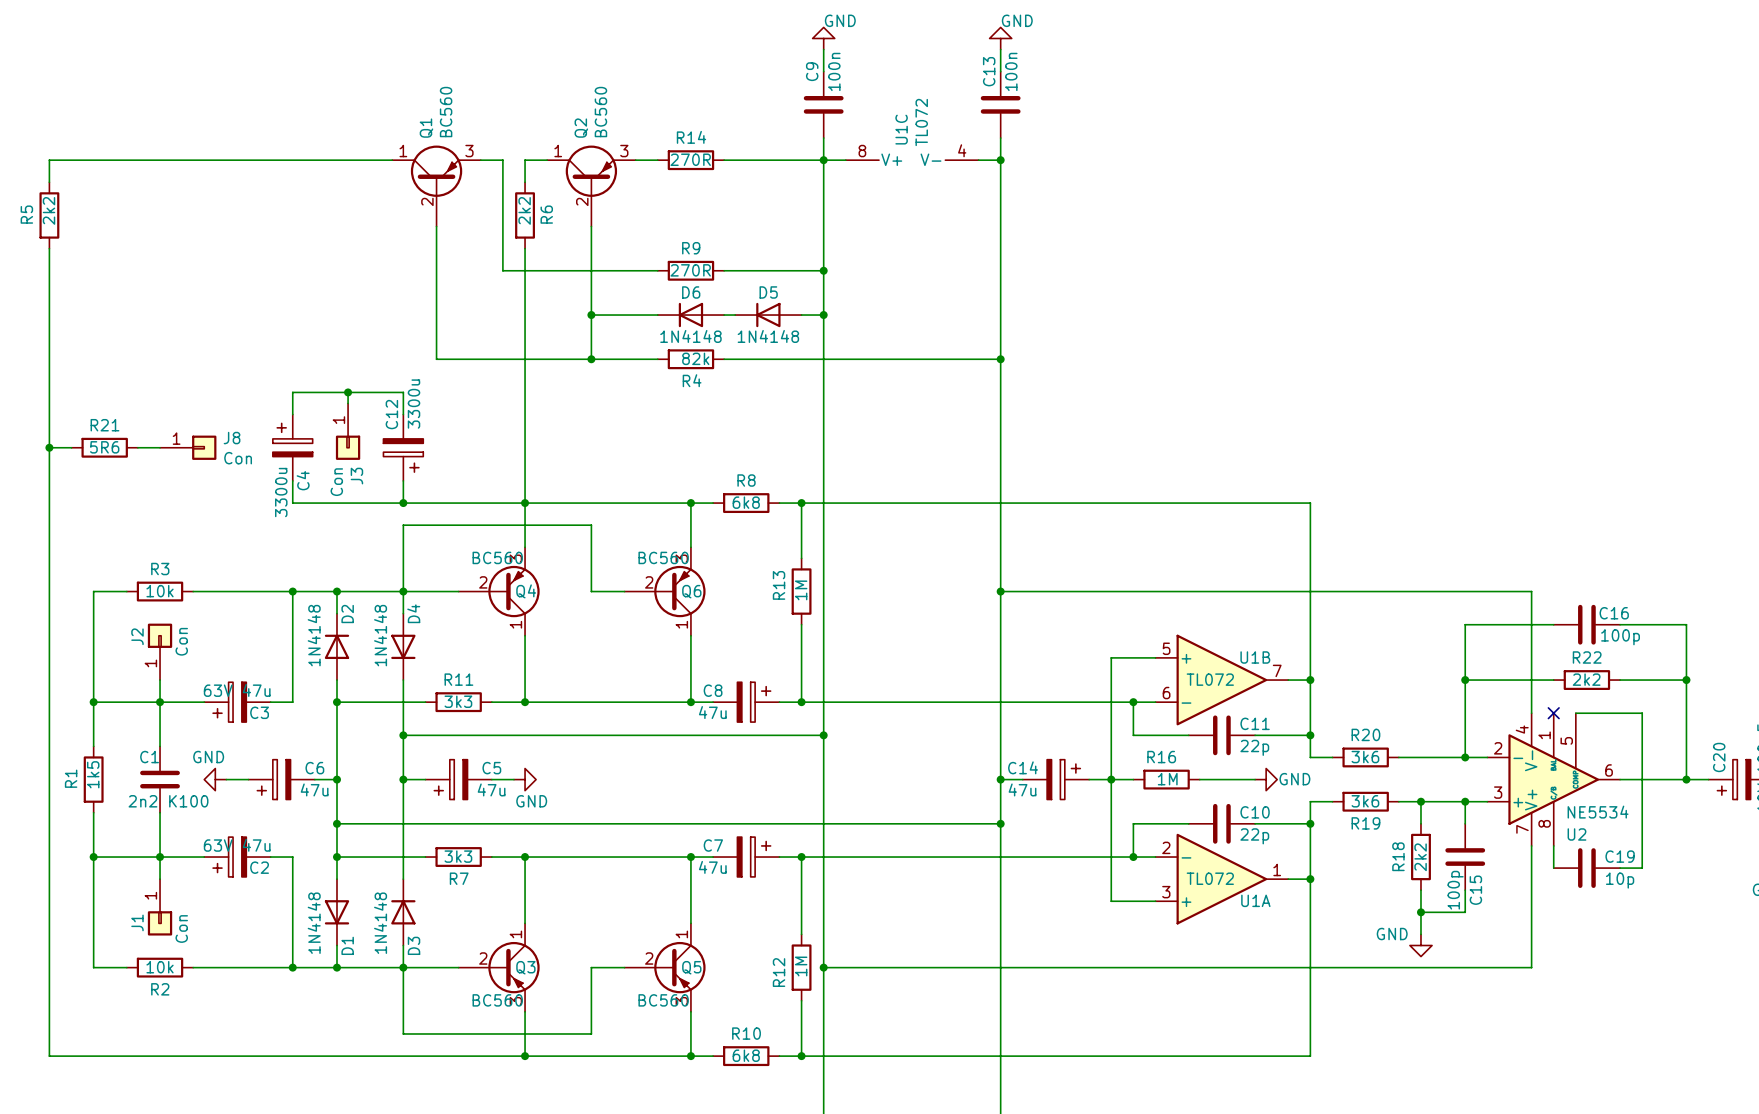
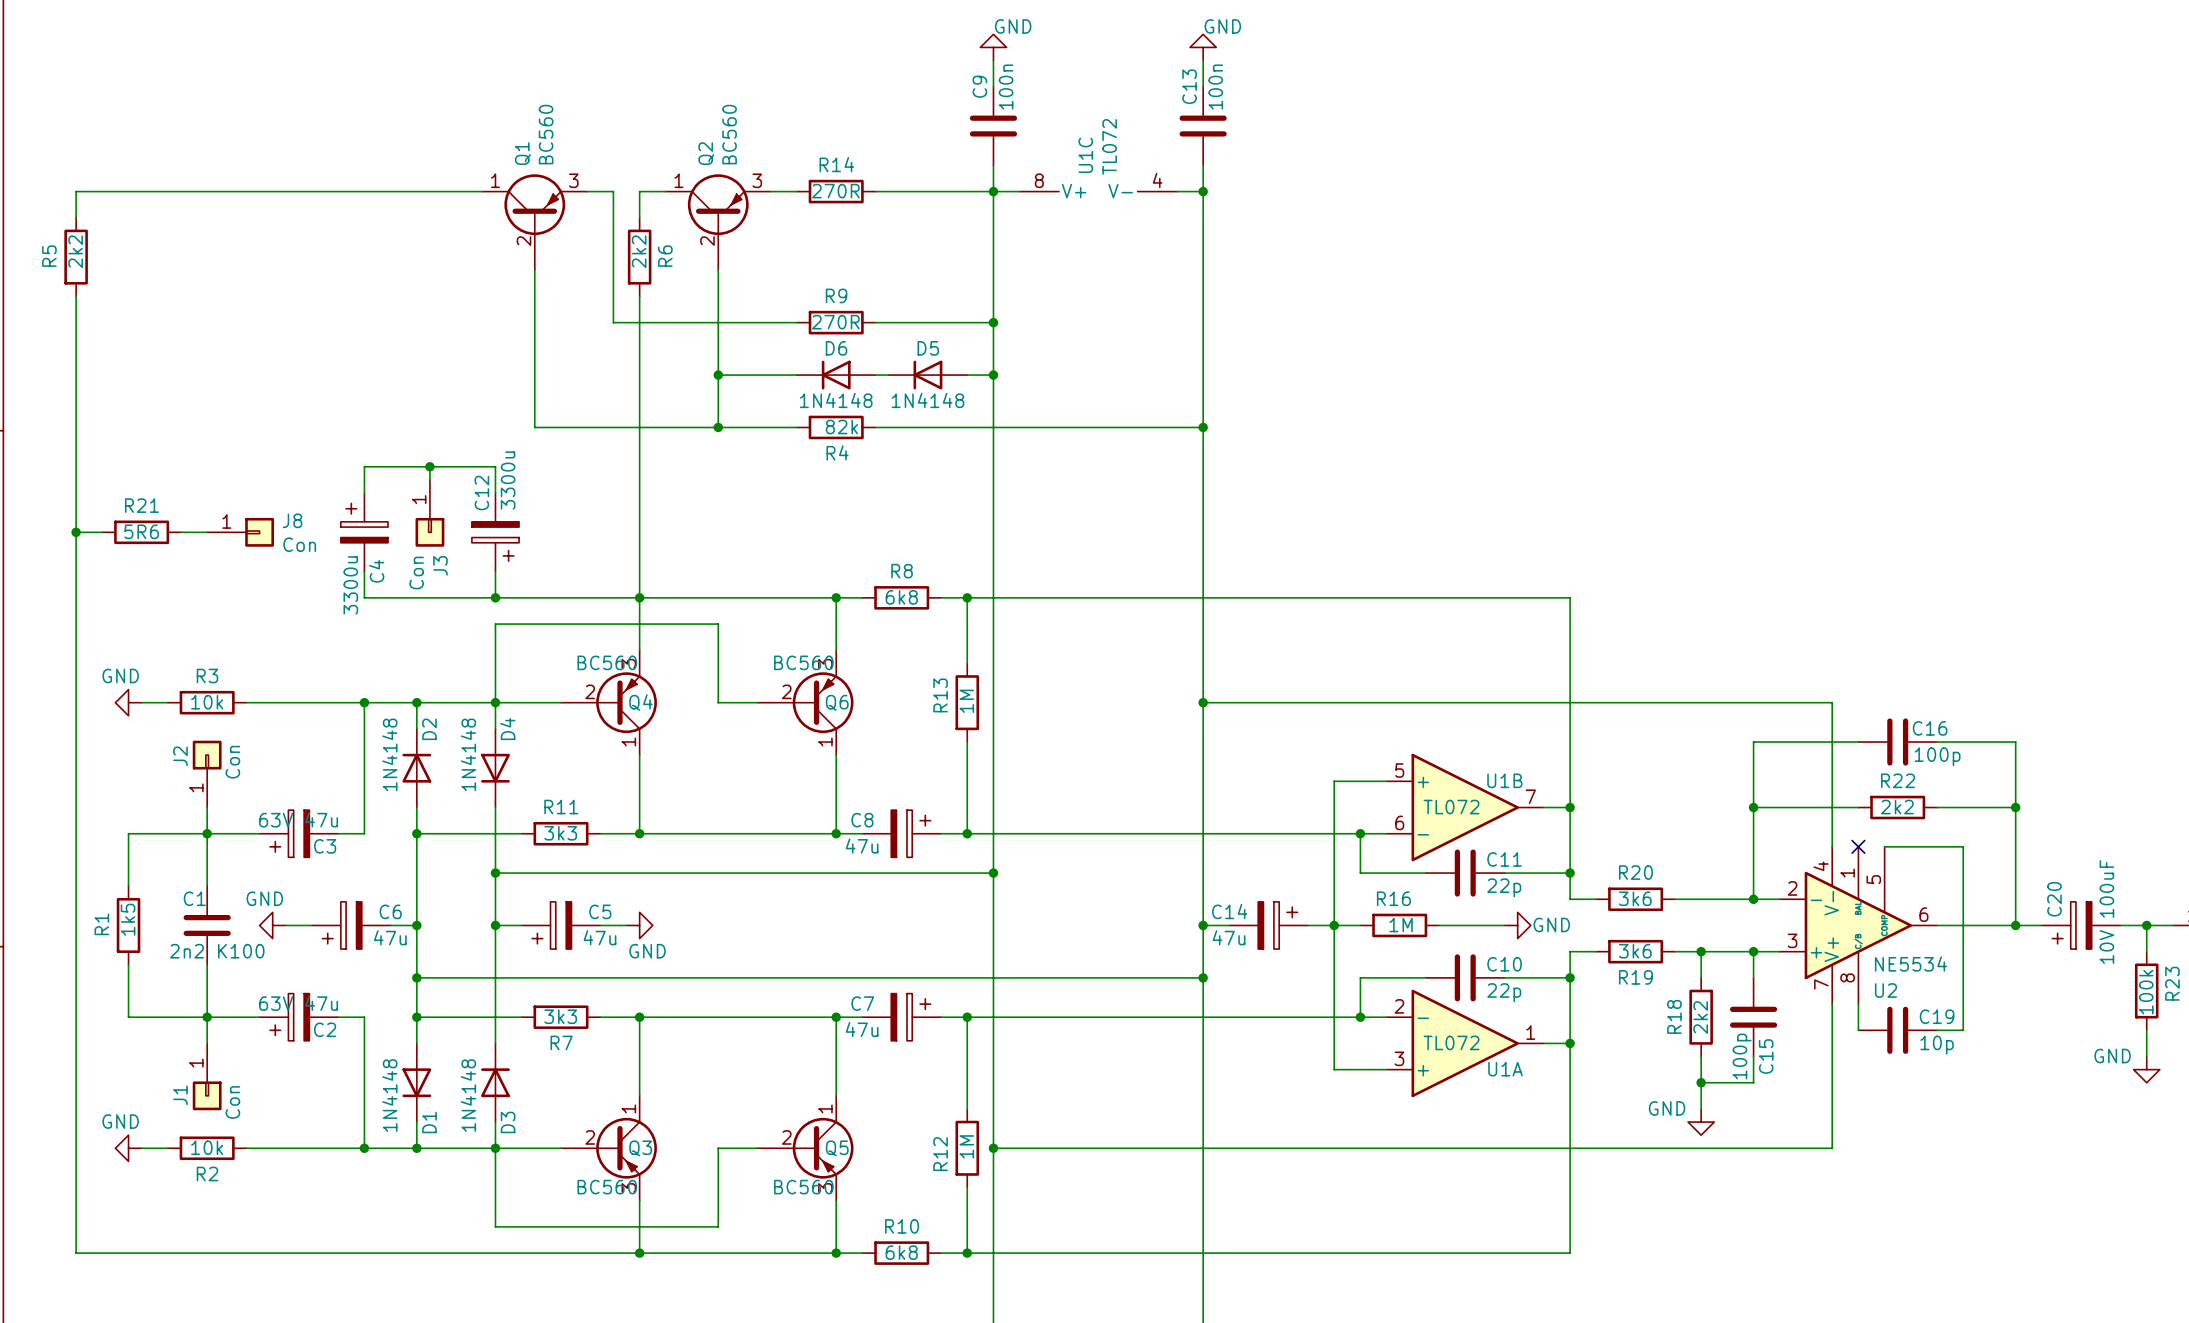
power symbol: none -> GND (128, 702)
wire: (104, 591) (93, 591) (93, 702) -> none
junction: (93, 702) -> none
wire: (93, 857) (93, 967) (104, 967) -> none
junction: (93, 857) -> none
power symbol: none -> GND (128, 1148)

